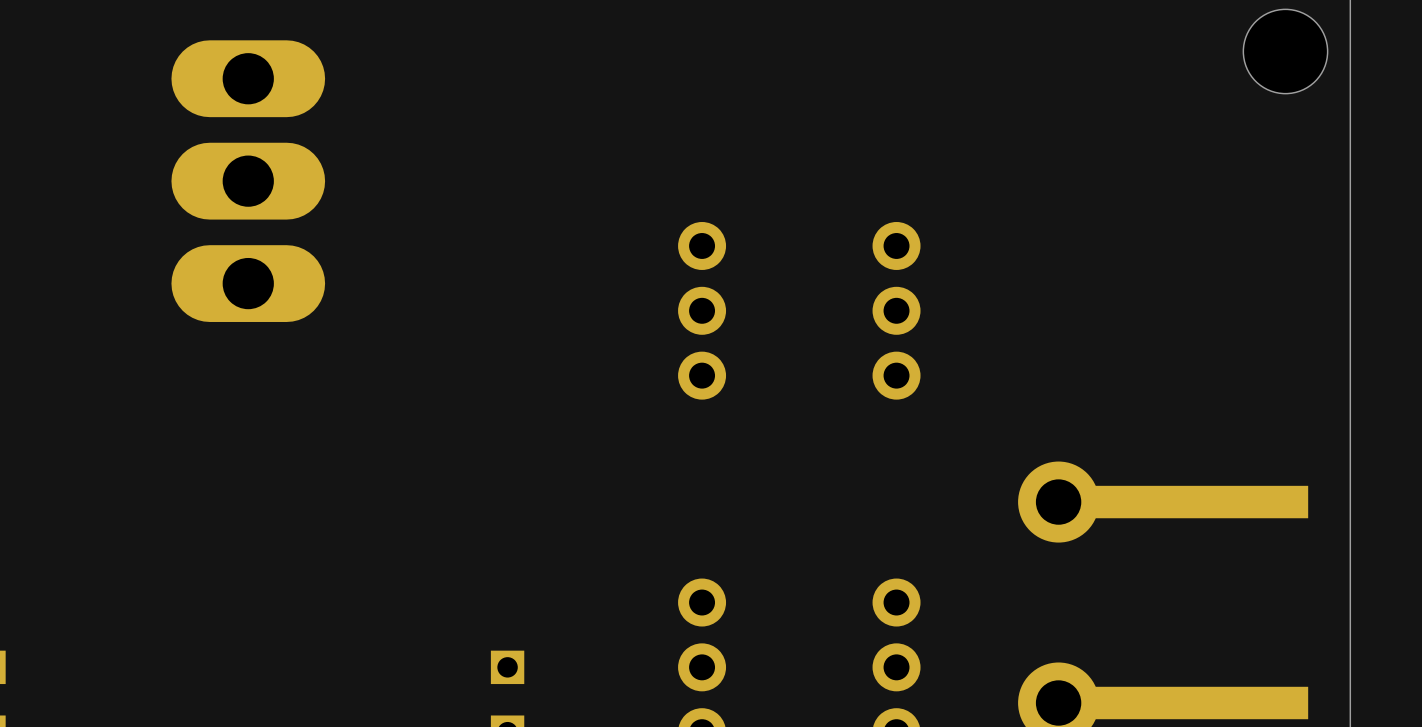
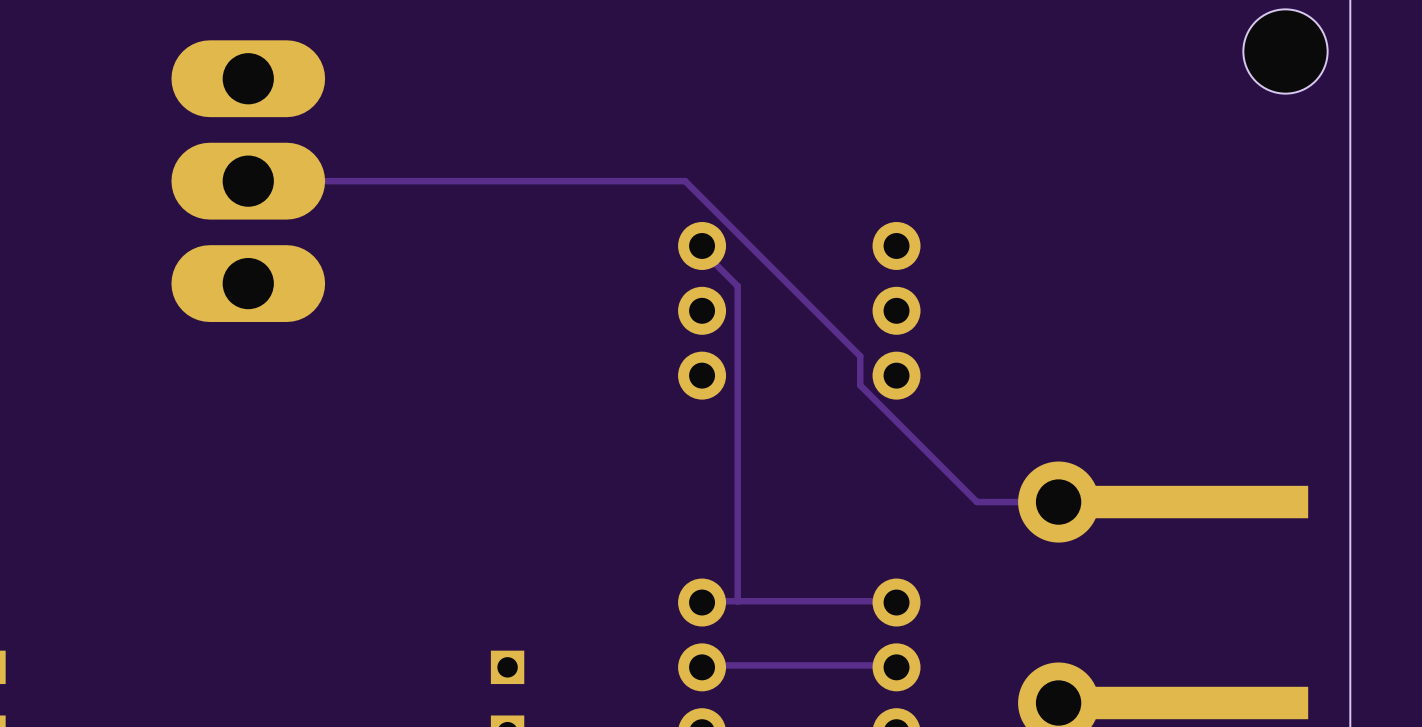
track: none -> (248, 181) (685, 181) (860, 356) (860, 385) (976, 502) (1194, 502)
track: none -> (702, 245) (702, 251) (737, 286) (737, 601)
track: none -> (896, 602) (702, 602)
track: none -> (896, 667) (895, 665) (702, 665) (702, 667)

